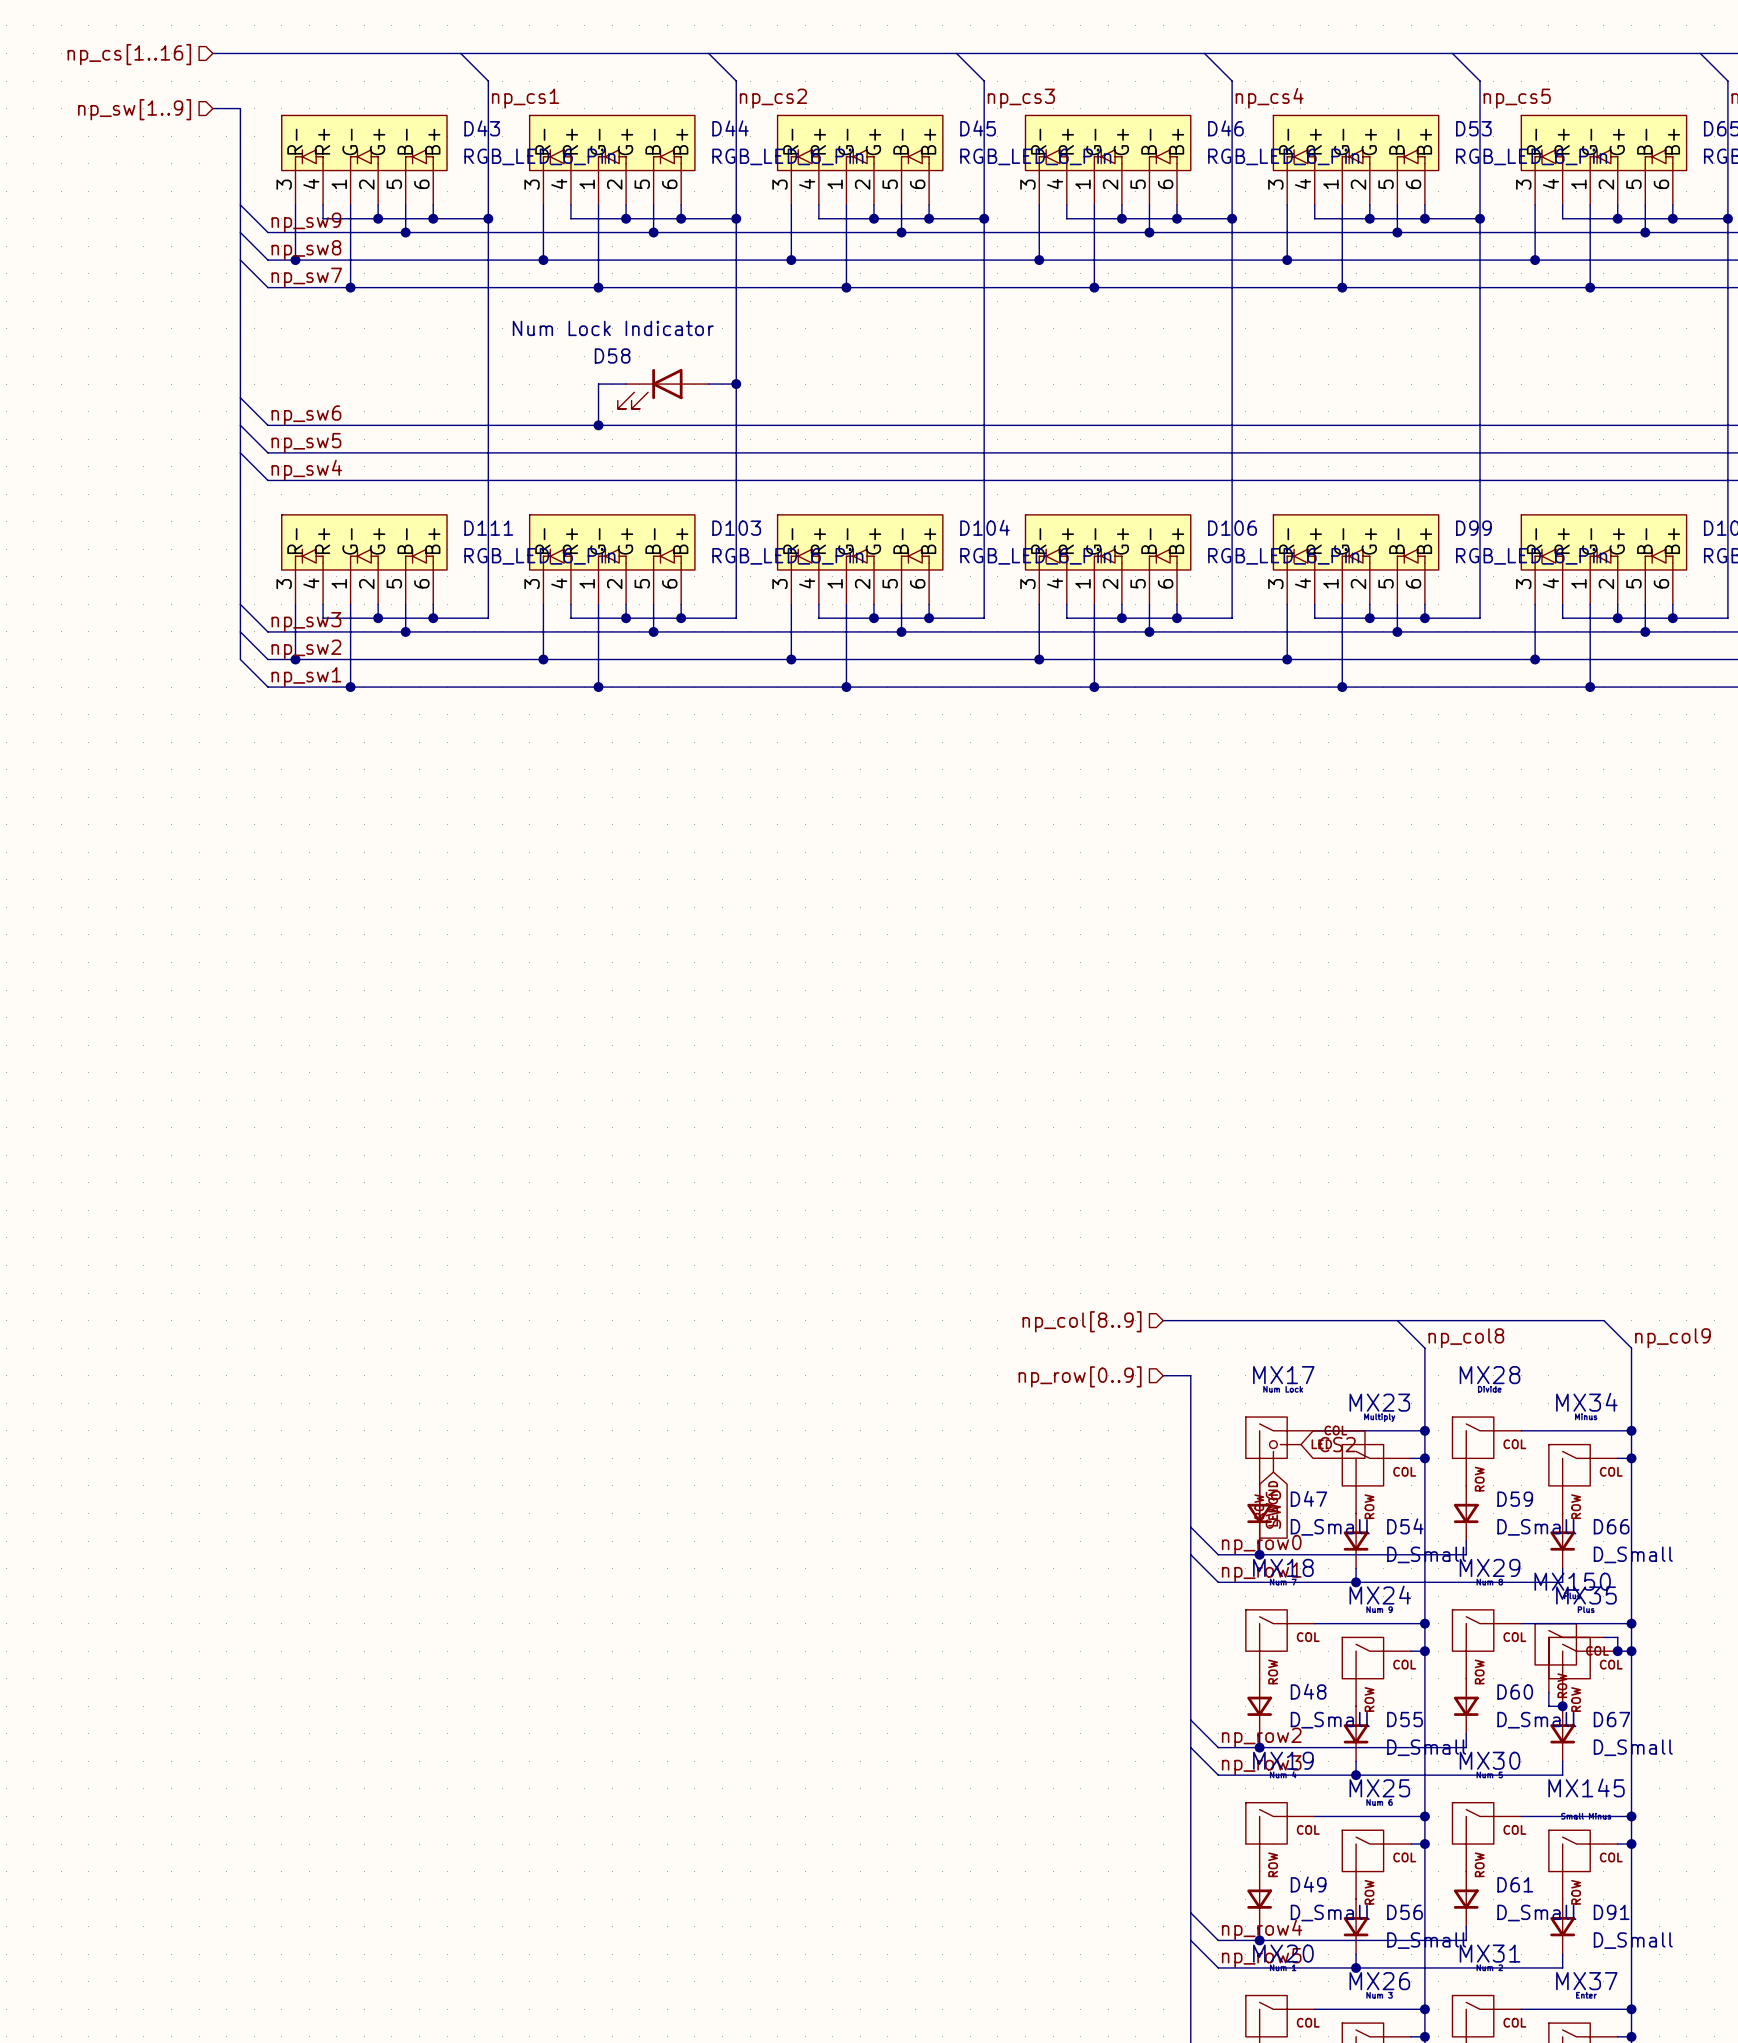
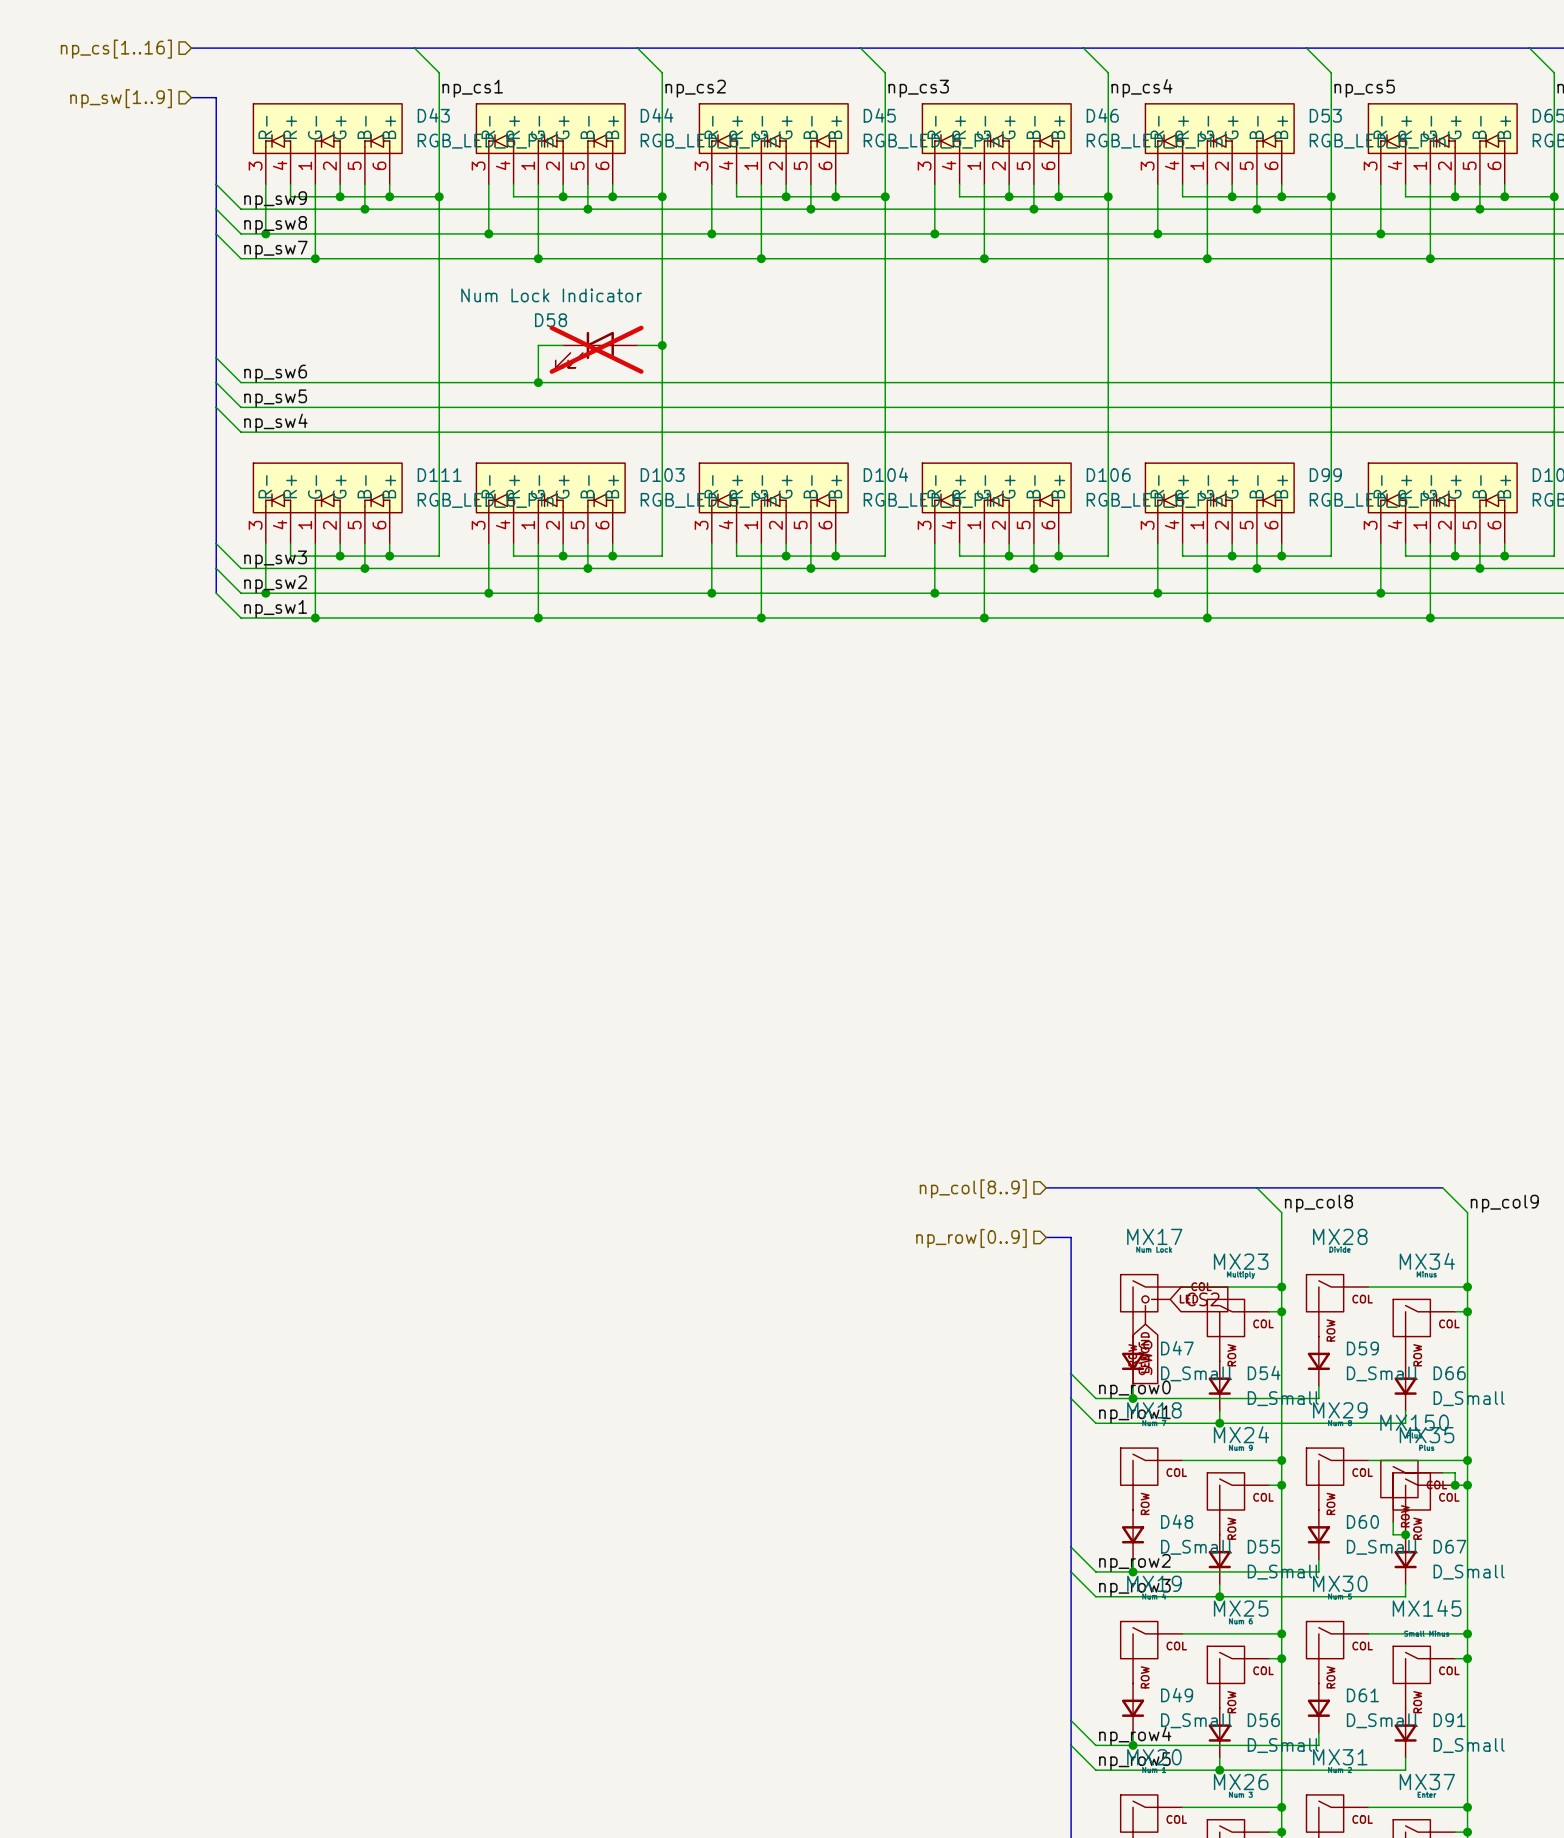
D58 do-not-place cross: none -> (596, 349)

